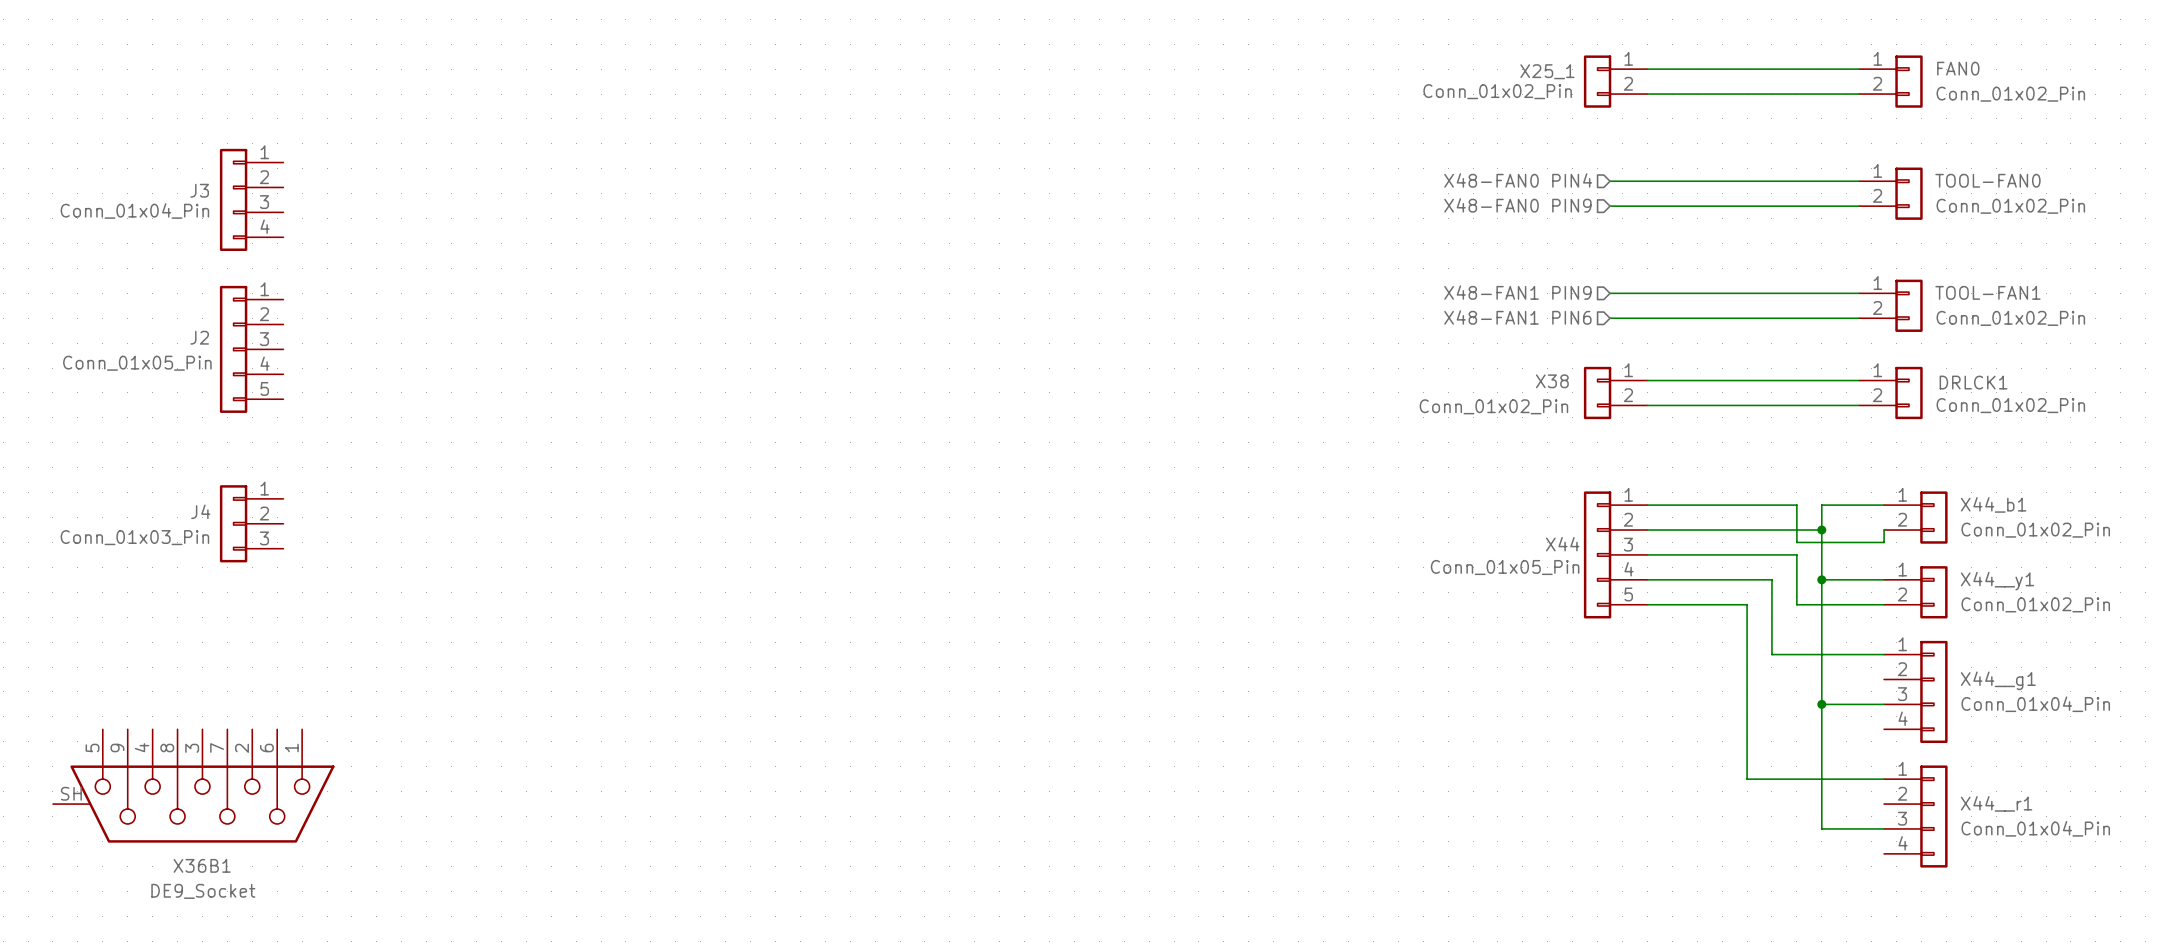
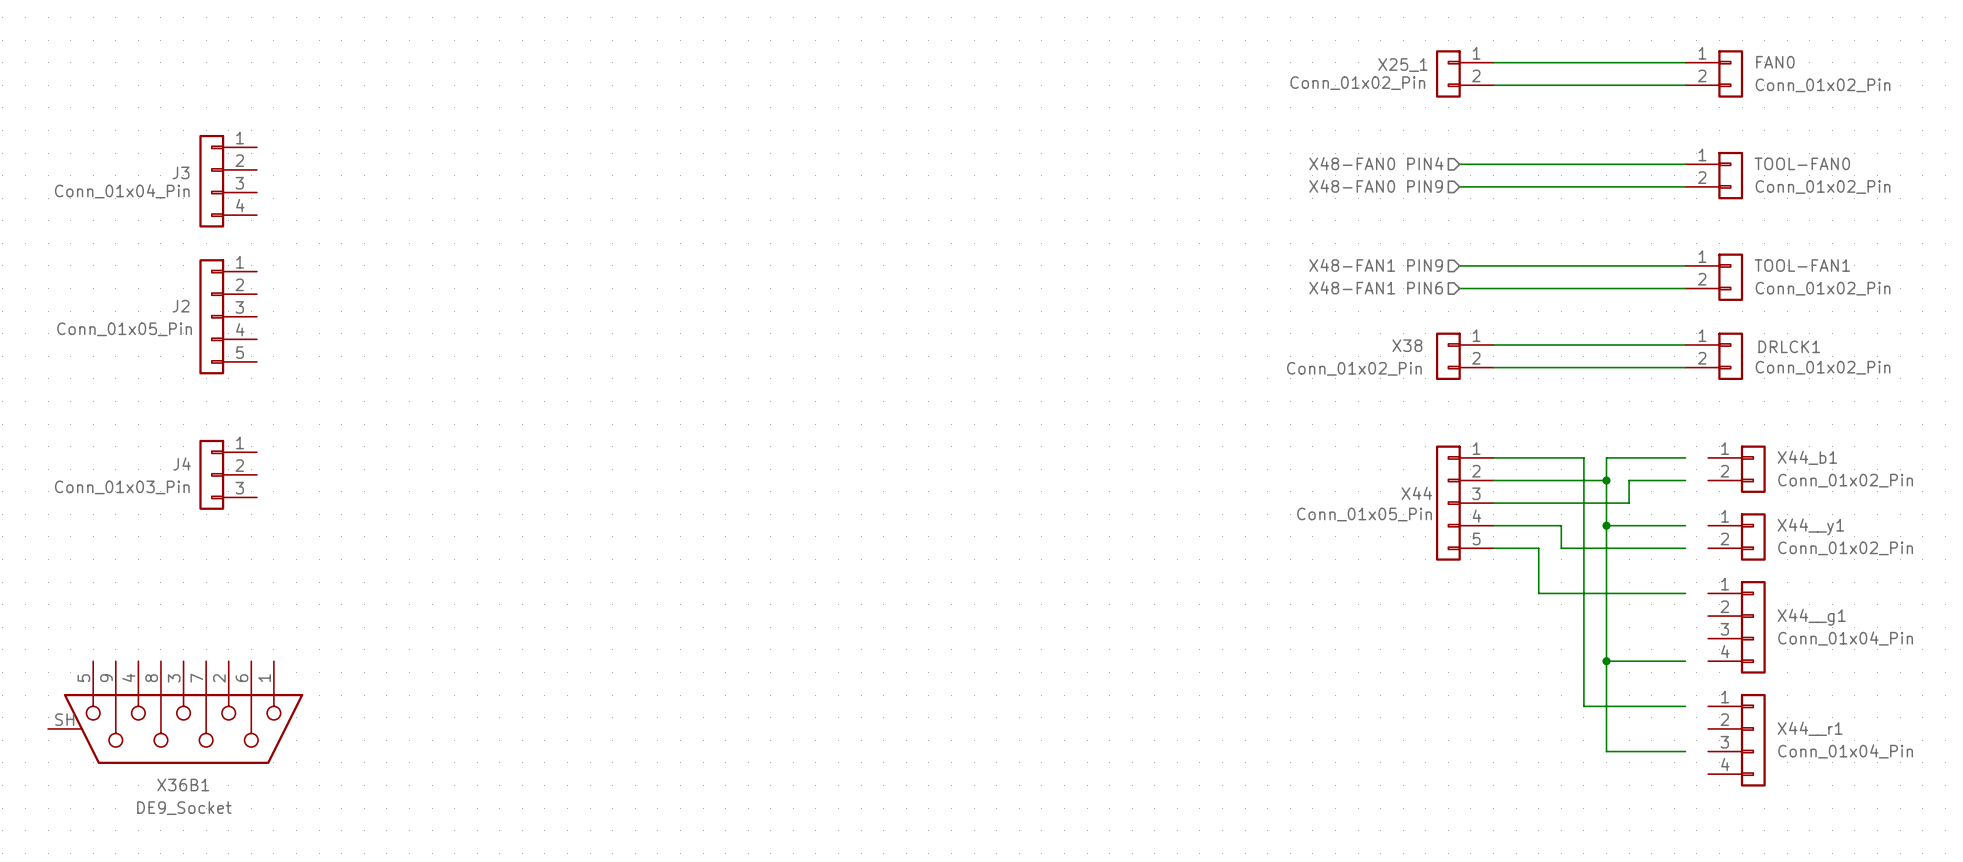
wire: (1747, 505) (1771, 505) -> (1583, 457) (1583, 548) (1629, 548)
wire: none -> (1606, 457) (1606, 525) (1651, 525)
wire: (1796, 505) (1796, 530) (1771, 530) -> (1629, 457) (1651, 457)
wire: (1821, 505) (1821, 828) -> (1538, 548) (1538, 593) (1606, 593) (1606, 751) (1651, 751)
wire: (1859, 505) (1884, 505) -> none
junction: none -> (1606, 480)
wire: none -> (1651, 480) (1685, 480)
junction: (1821, 530) -> none
wire: (1884, 530) (1884, 542) (1796, 542) -> none
wire: (1796, 554) (1796, 604) -> (1629, 503) (1629, 491)
wire: (1722, 579) (1771, 579) -> none
junction: none -> (1606, 525)
junction: (1821, 579) -> none
wire: (1859, 579) (1884, 579) -> none
wire: (1697, 604) (1722, 604) -> (1561, 525) (1561, 548)
wire: (1859, 604) (1884, 604) -> none
wire: (1859, 654) (1884, 654) -> none
wire: (1821, 704) (1884, 704) -> none
junction position: (1821, 704) -> (1606, 661)
wire: none -> (1606, 661) (1685, 661)
wire: (1859, 779) (1884, 779) -> none
wire: (1859, 828) (1884, 828) -> none

